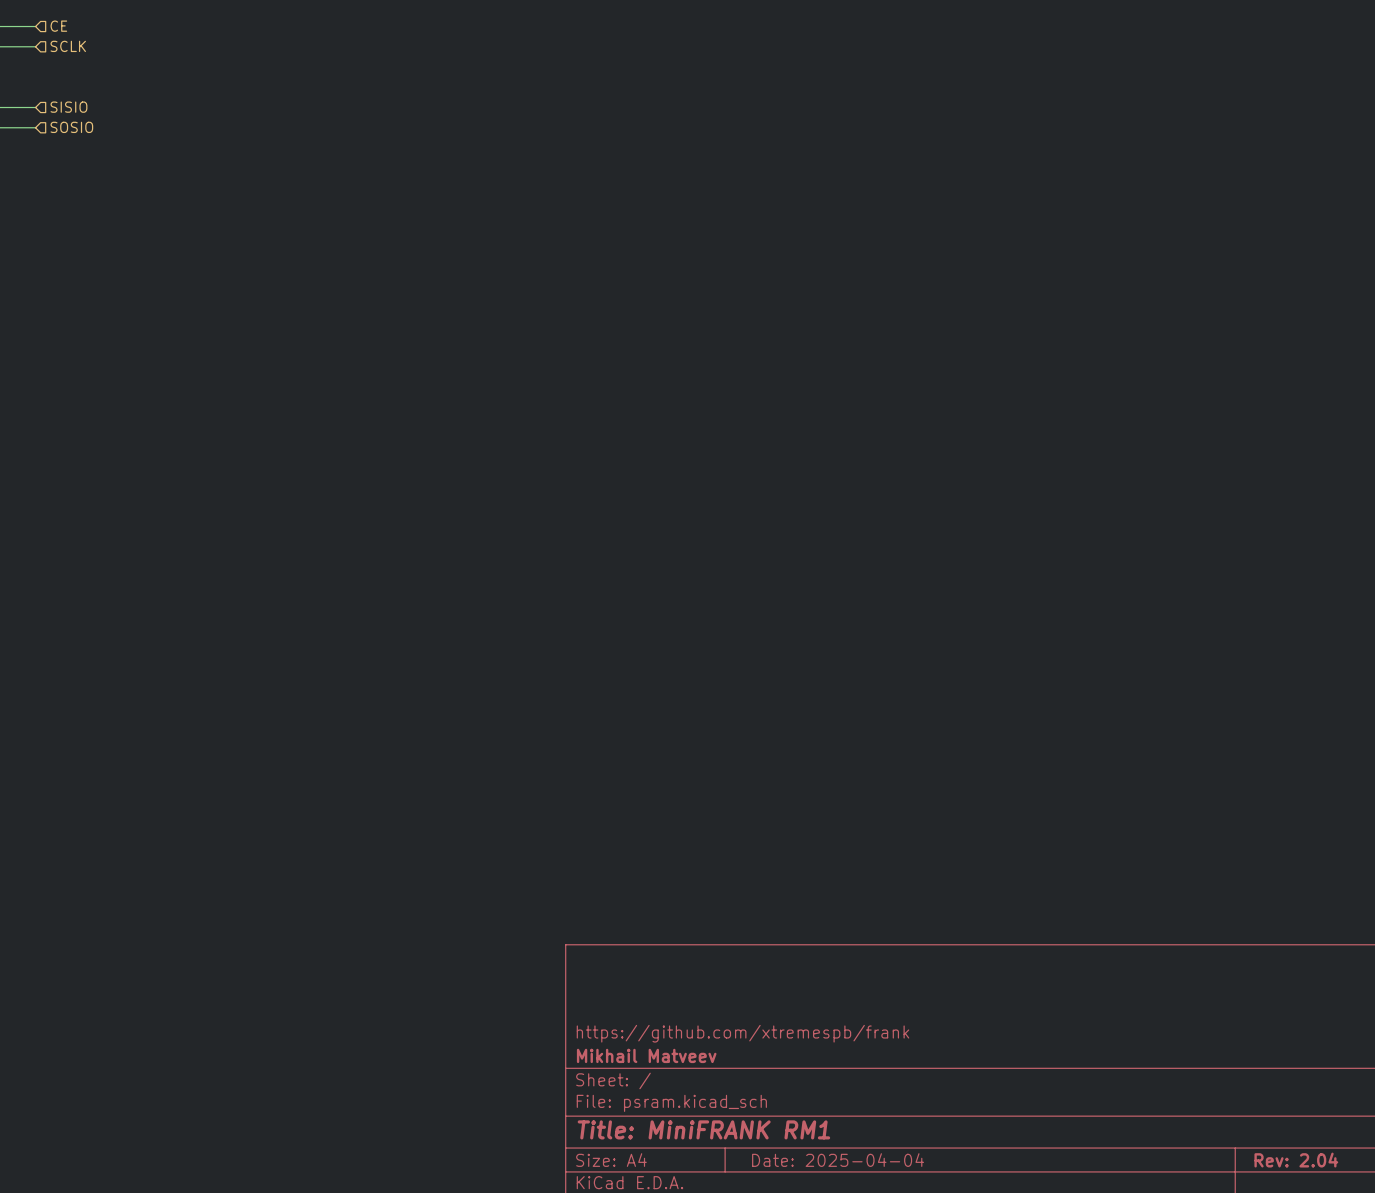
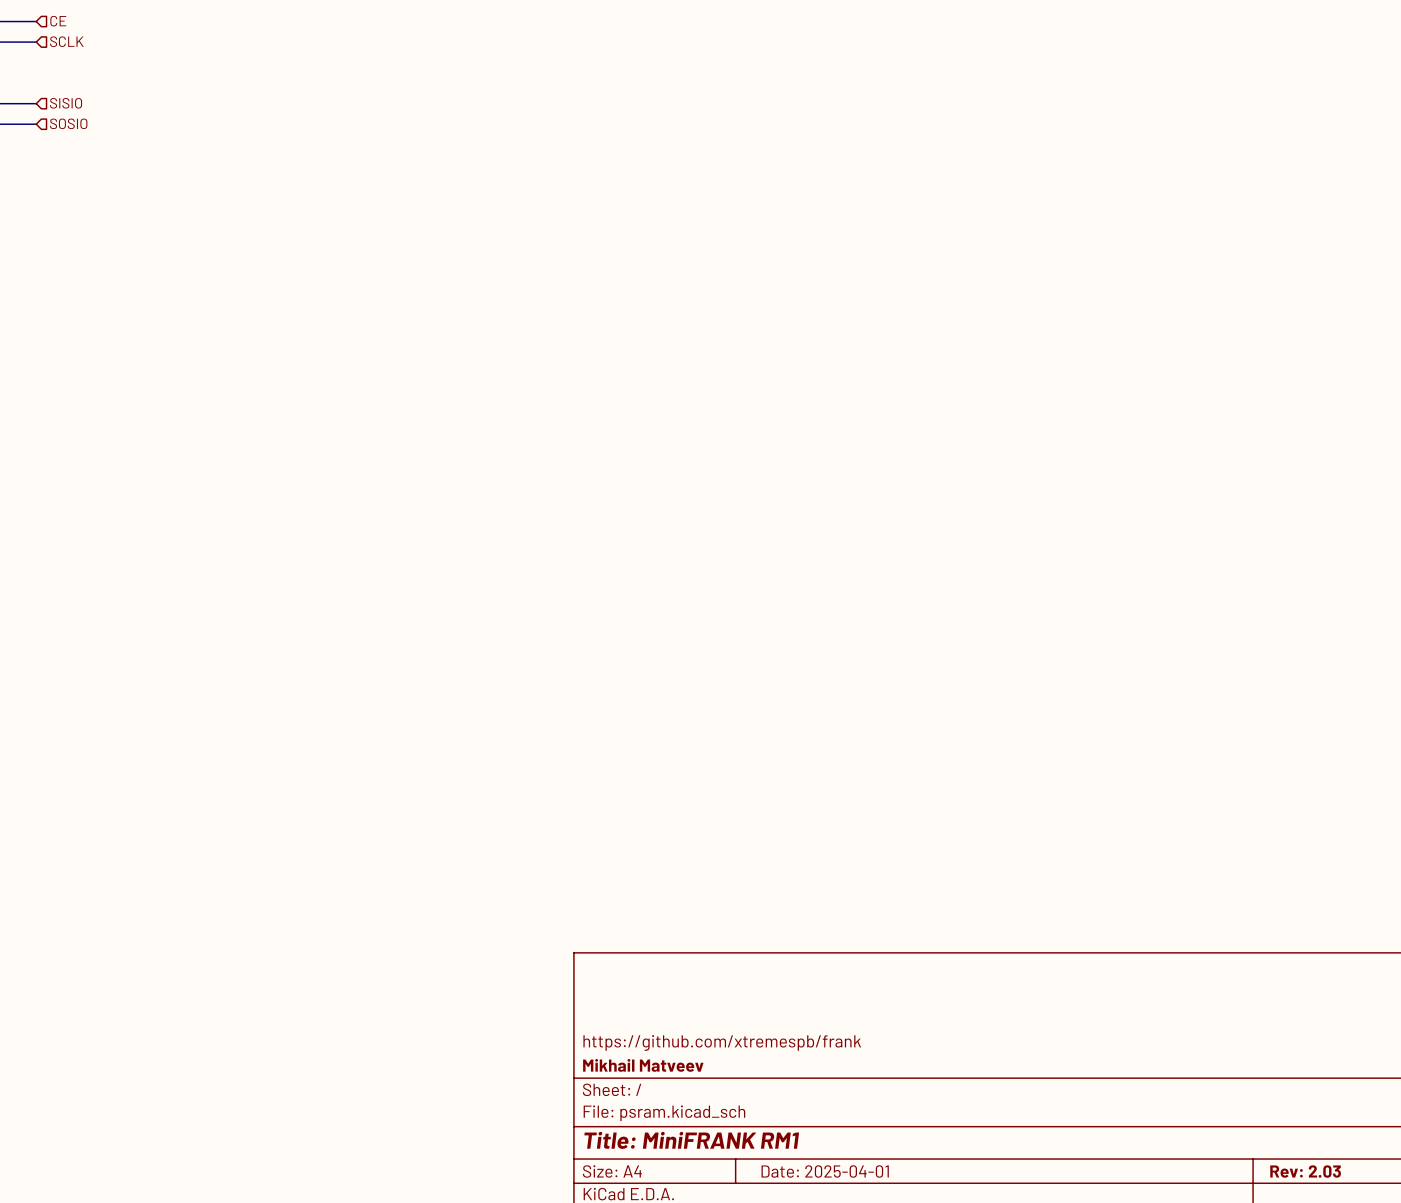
title block: Date: 2025-04-04 (838, 1160) -> Date: 2025-04-01 (825, 1171)
title block: Rev: 2.04 (1296, 1160) -> Rev: 2.03 (1305, 1171)

